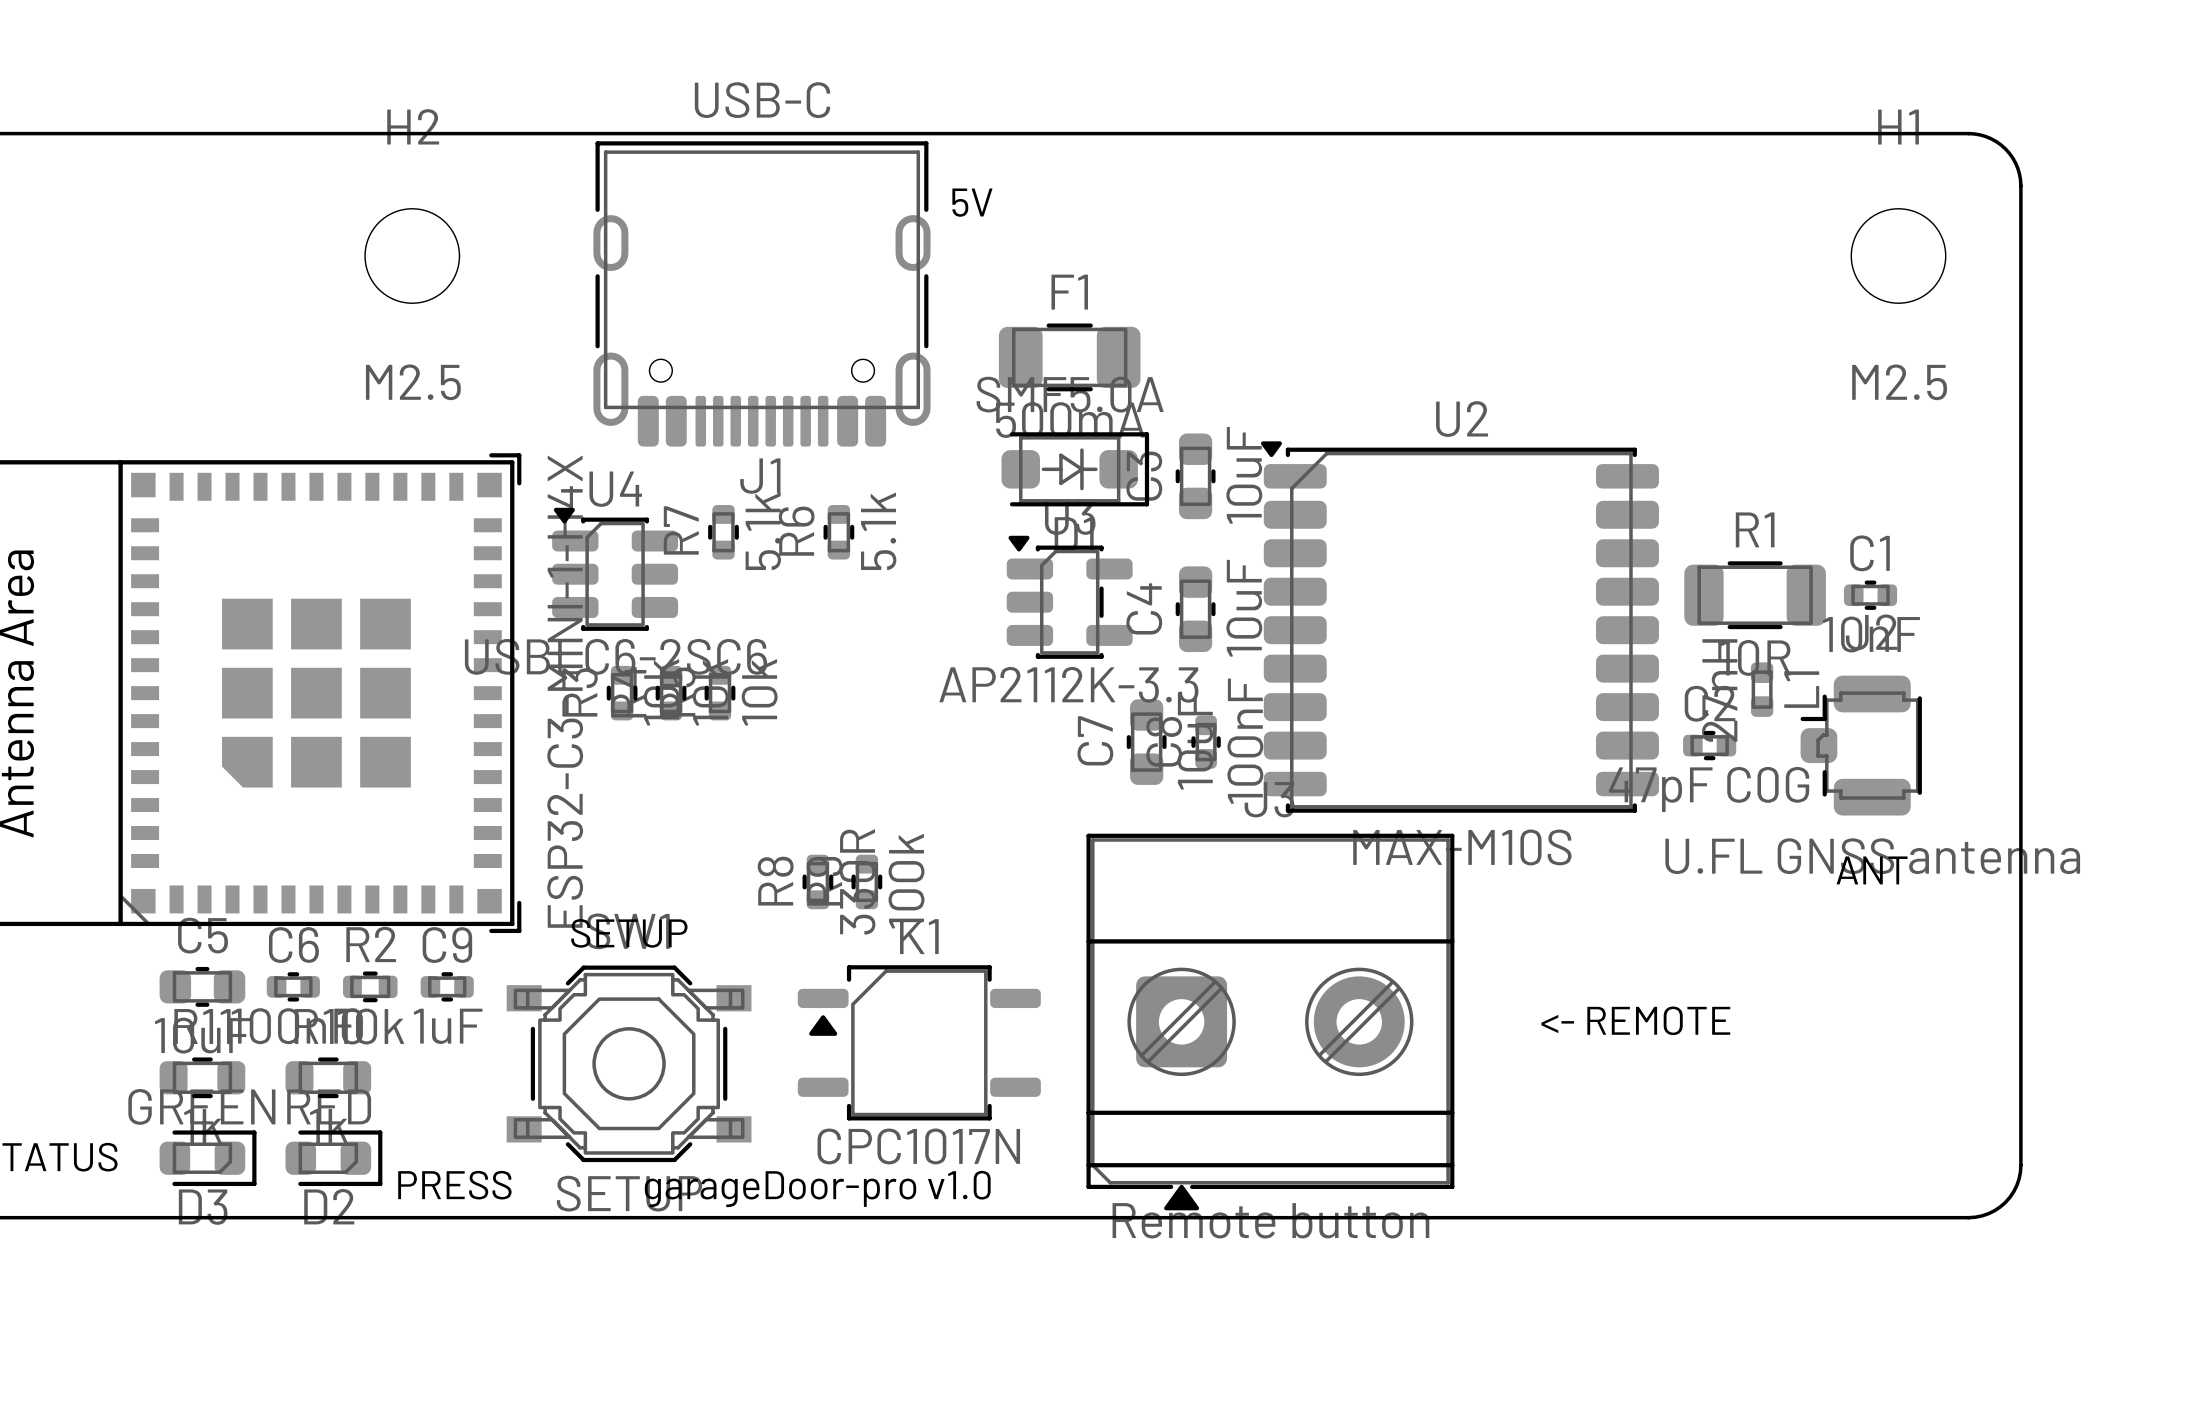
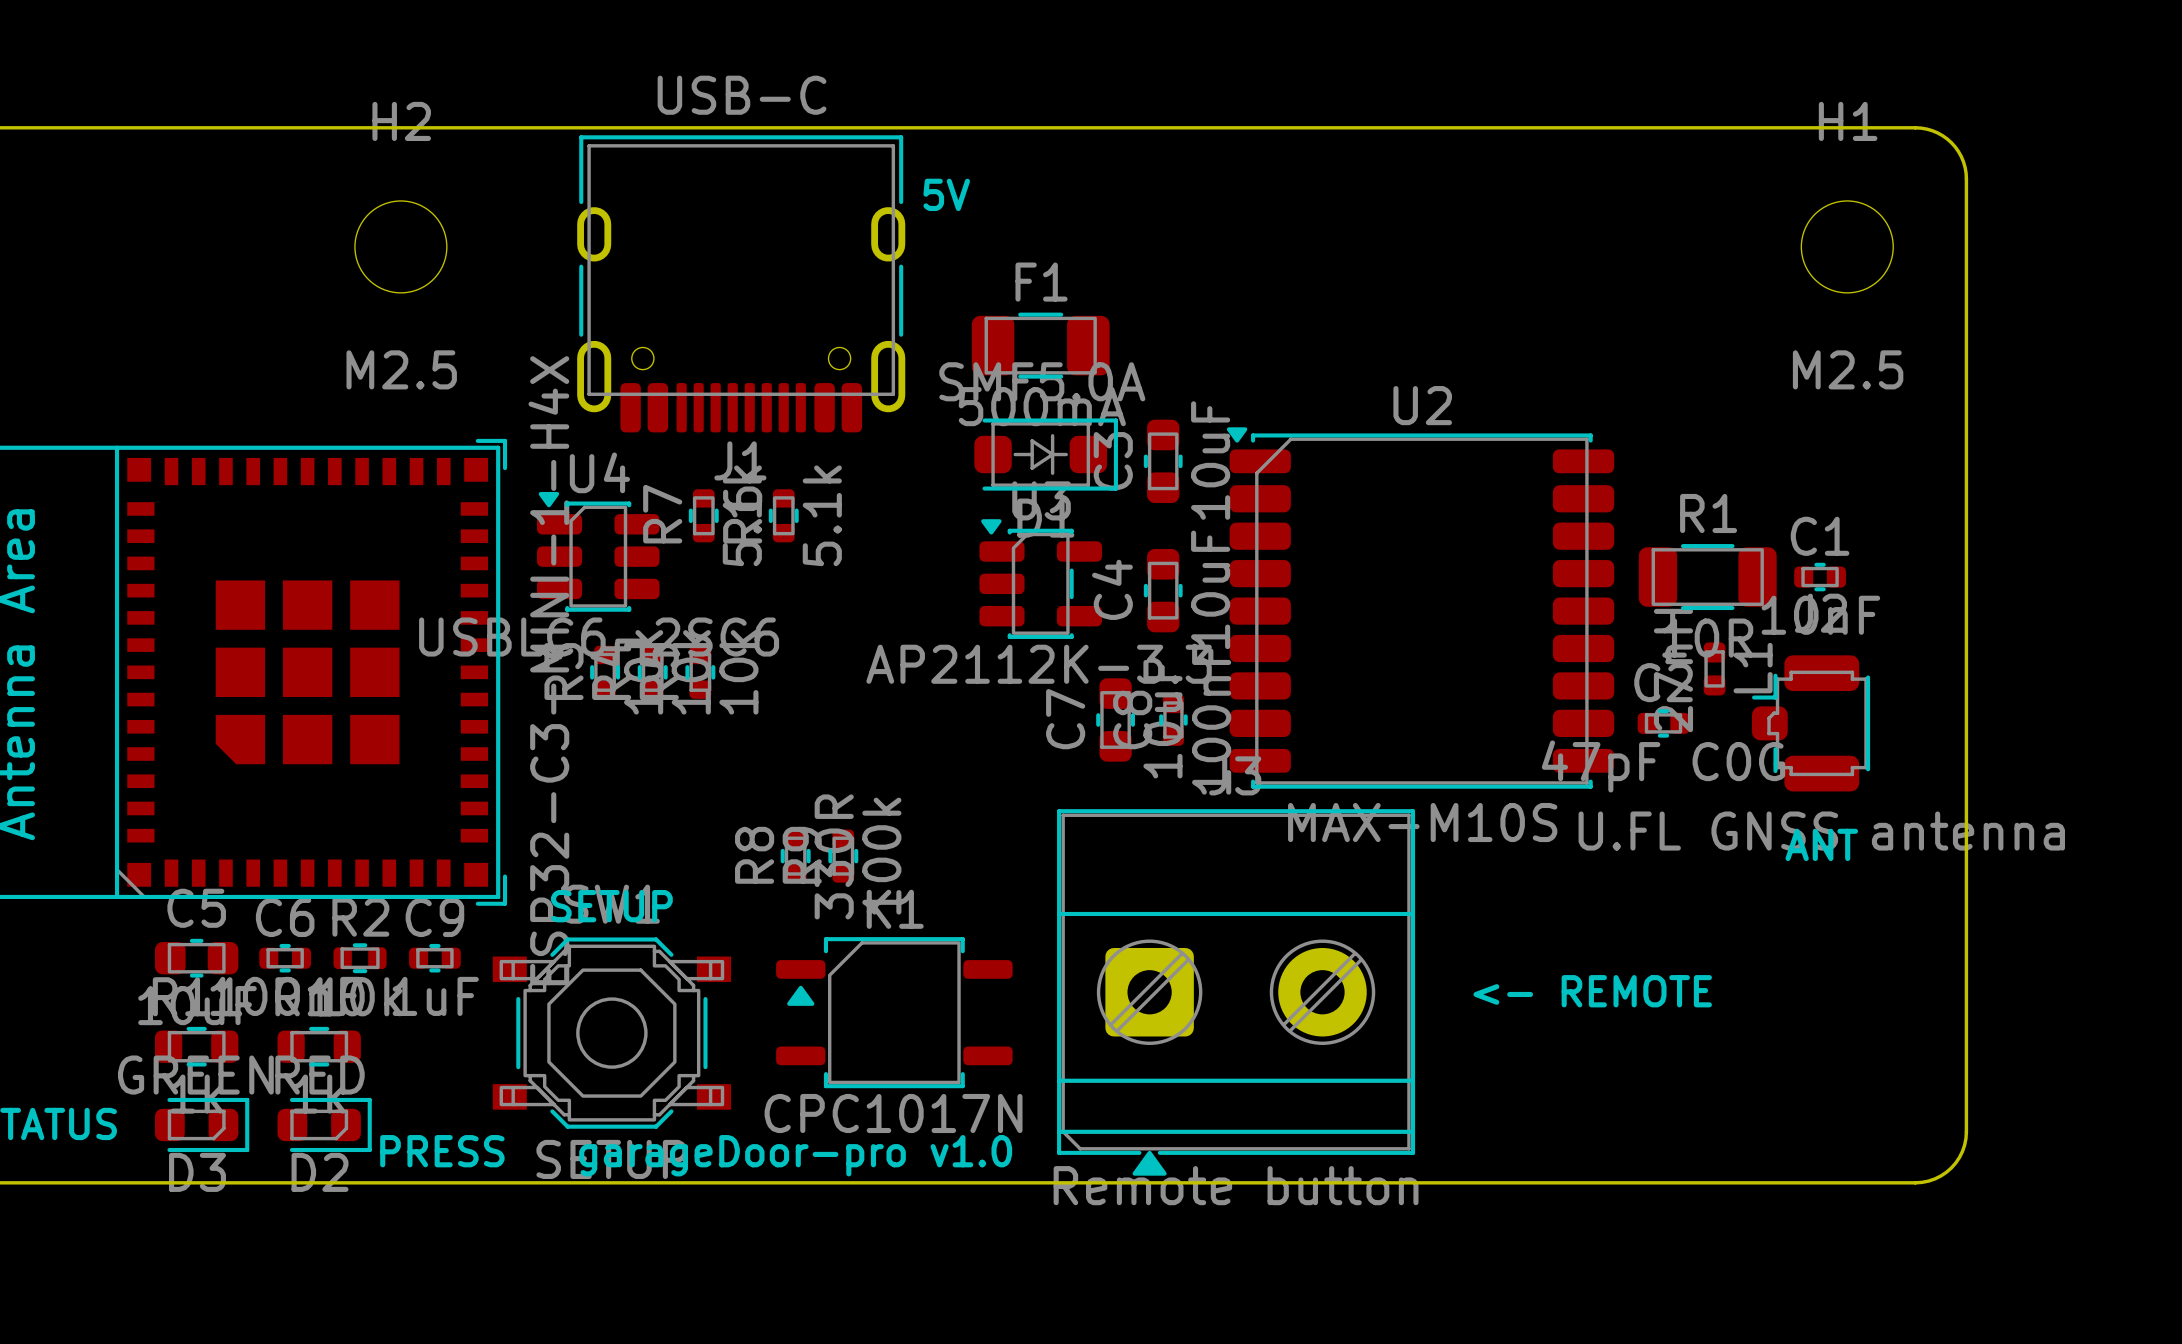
R6 position: (838, 532) -> (783, 515)

